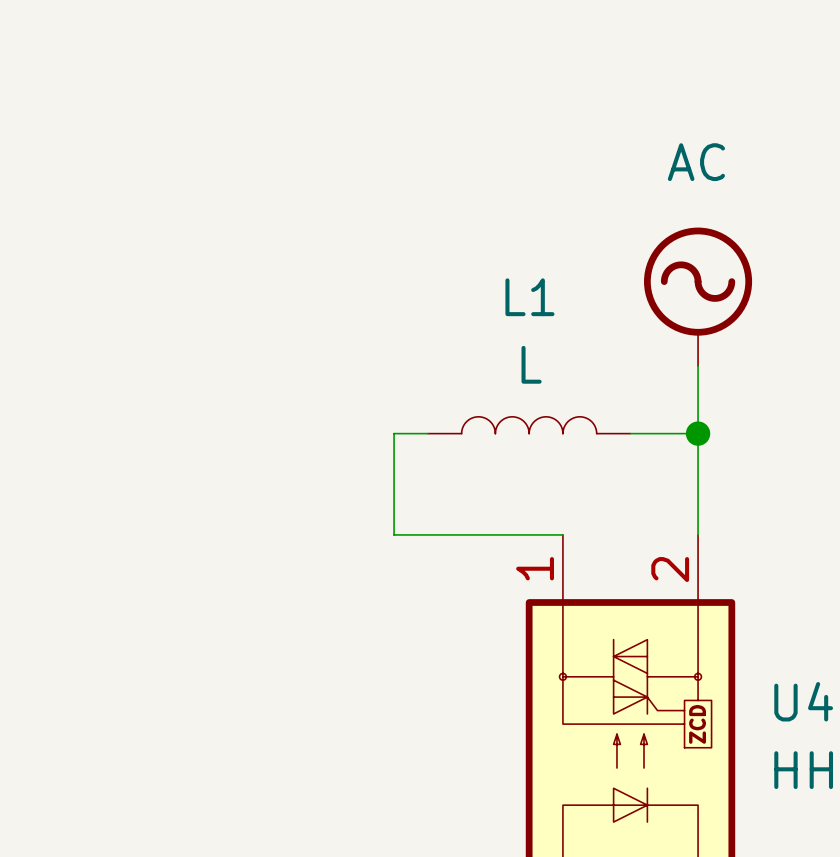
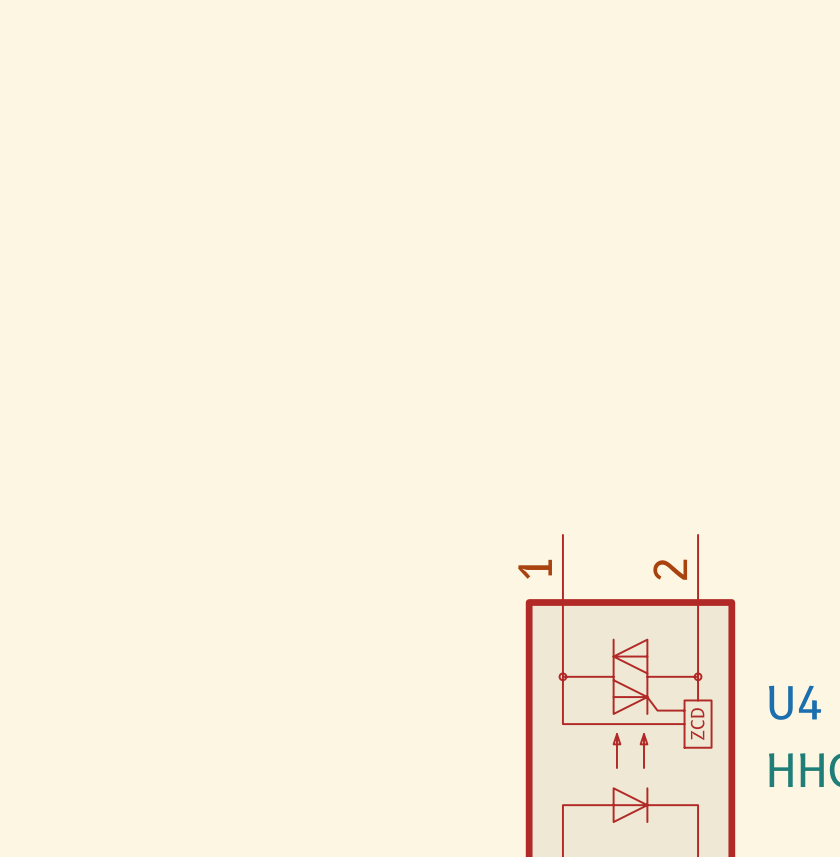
power symbol: AC (698, 296) -> none
wire: (698, 366) (698, 534) -> none
L1: L (529, 425) -> none
wire: (427, 433) (394, 433) (394, 534) (562, 534) -> none
wire: (630, 433) (698, 433) -> none
junction: (698, 433) -> none

